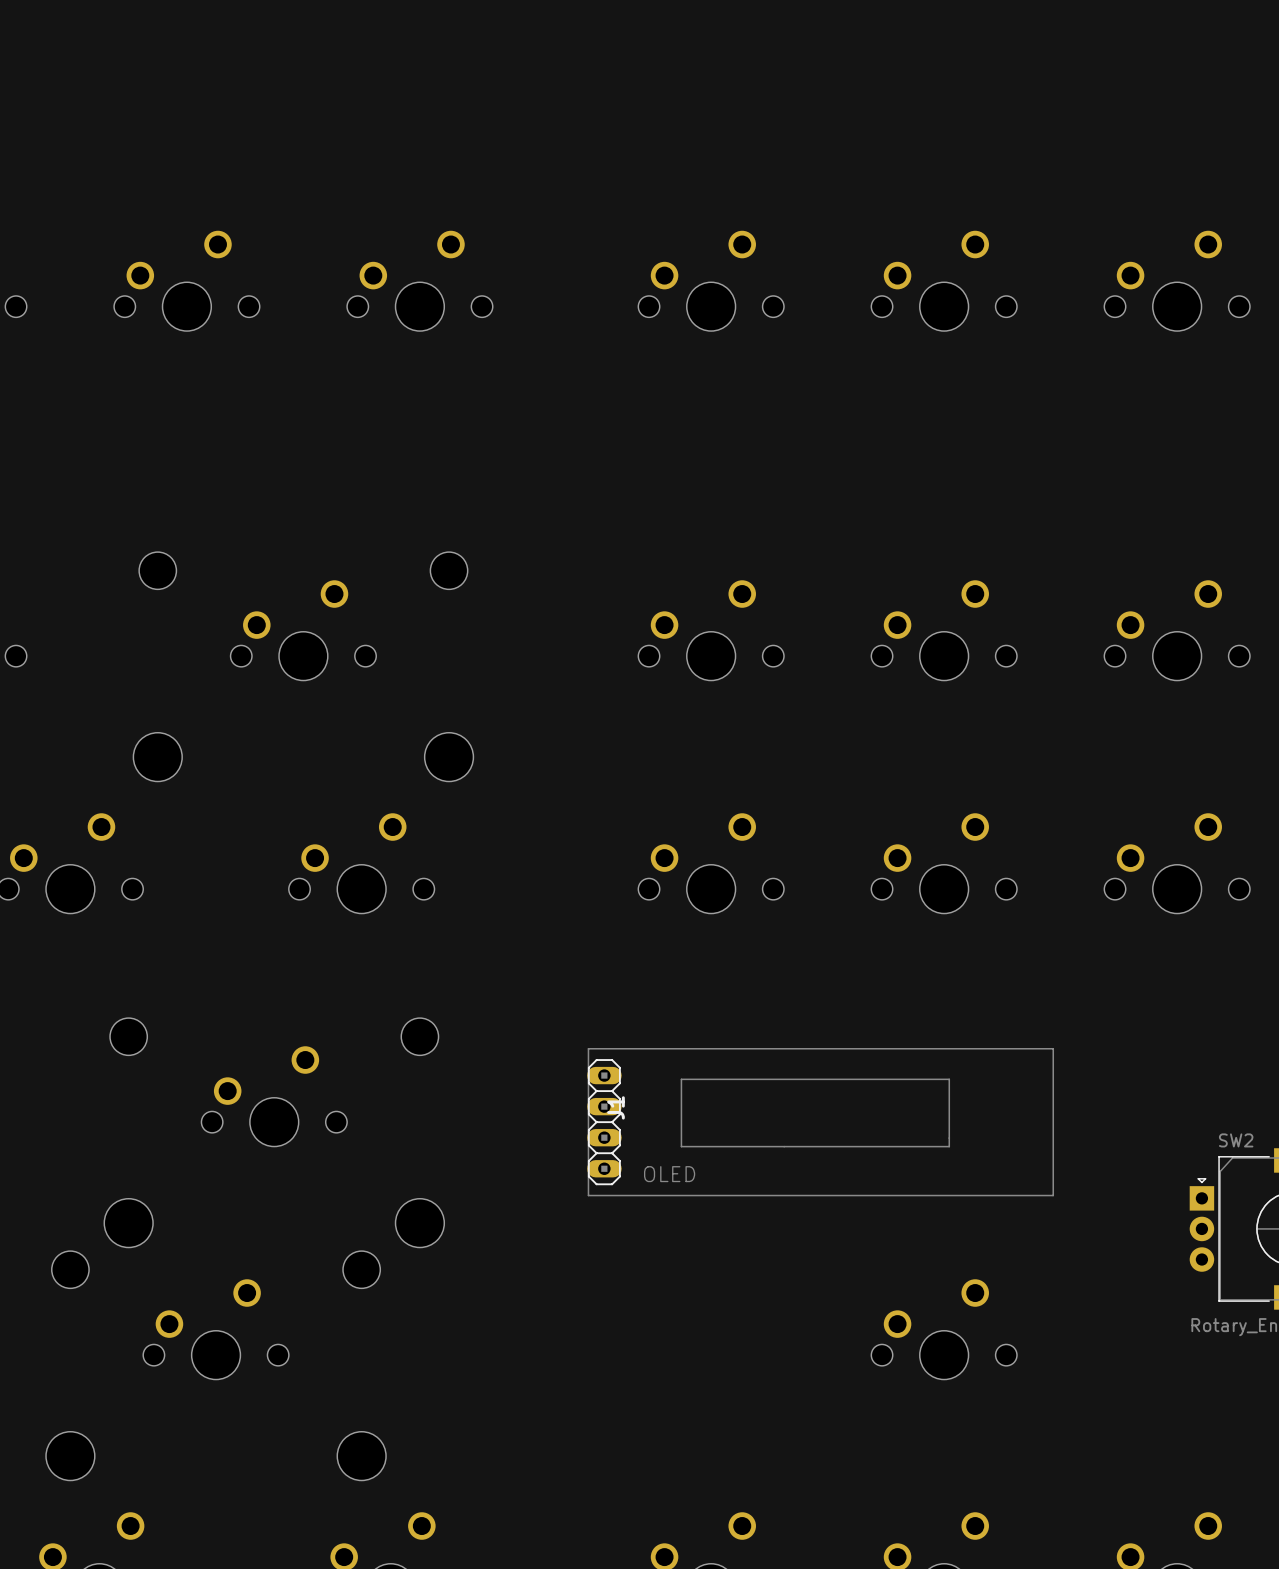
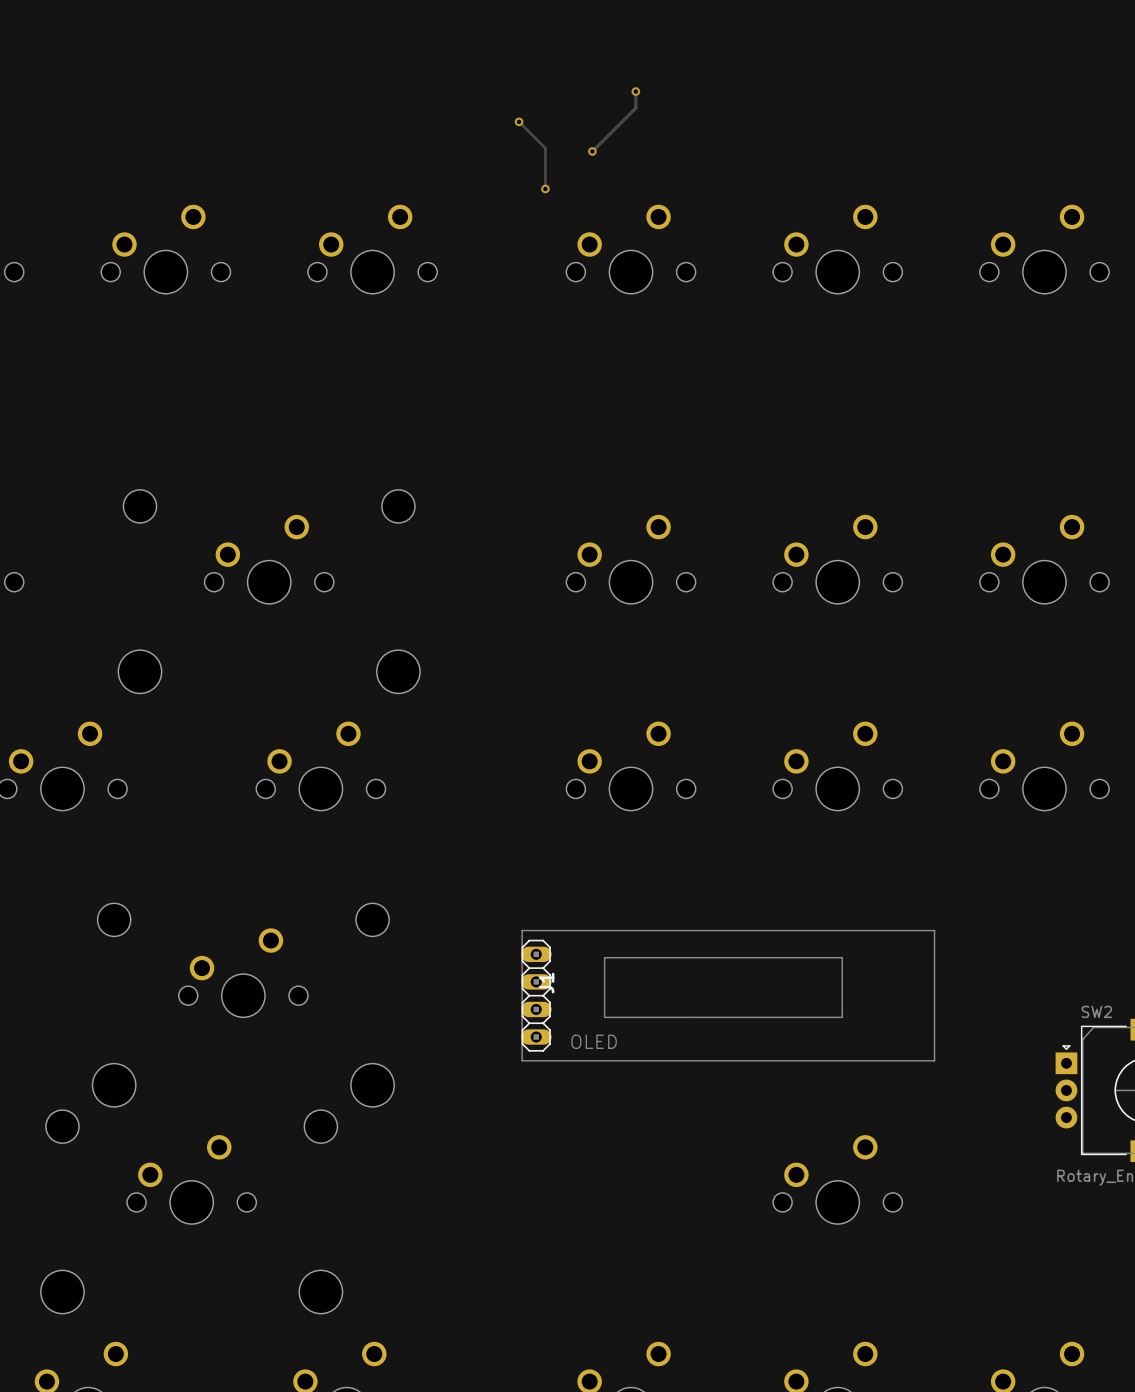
track: none -> (635, 91) (635, 108) (592, 151)
via: none -> (635, 91)
track: none -> (519, 121) (545, 148) (545, 188)
via: none -> (519, 121)
via: none -> (592, 151)
via: none -> (545, 188)

